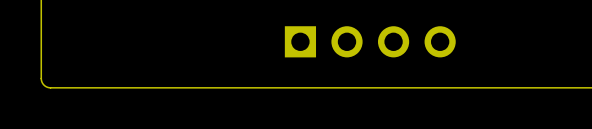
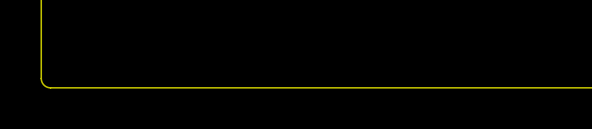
part: (370, 41) -> none

